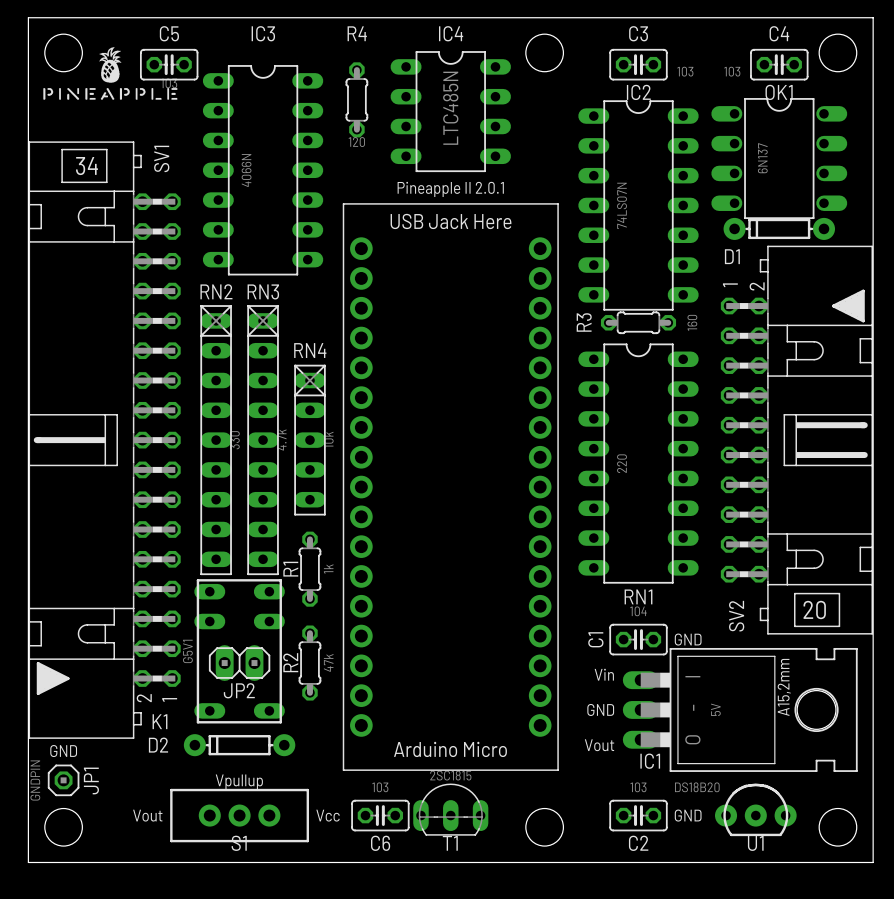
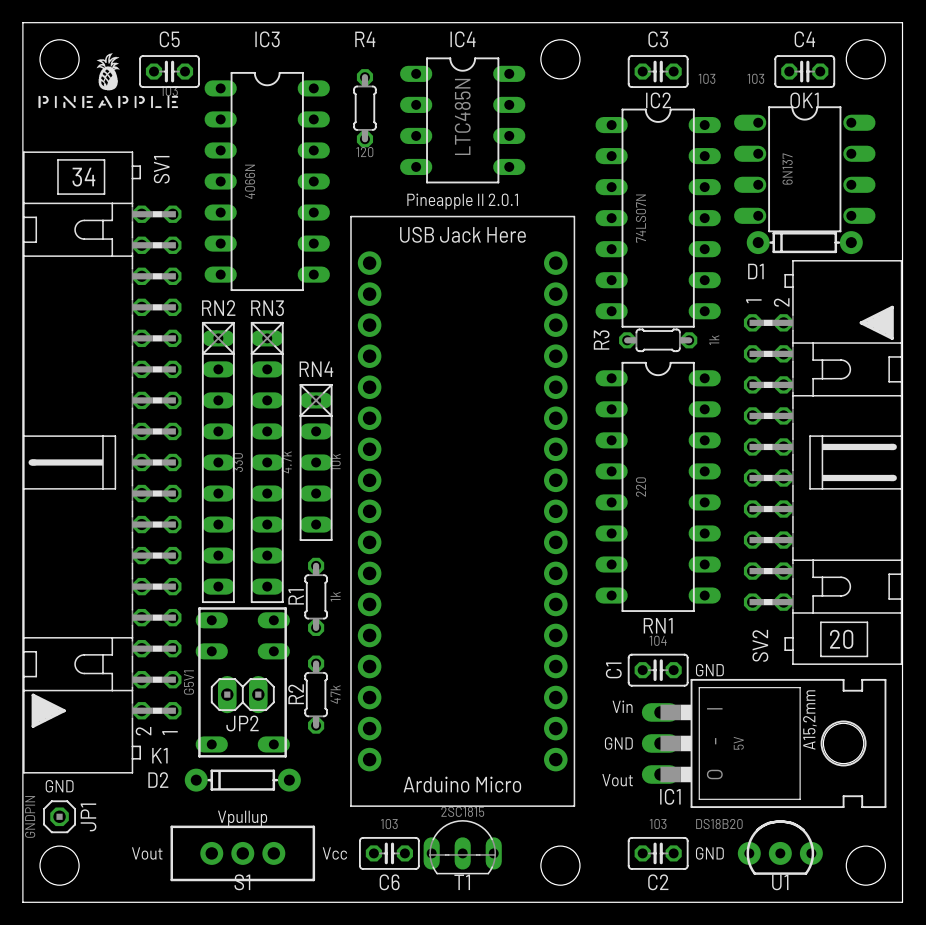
R3 value: 160 (692, 322) -> 1k (714, 340)

